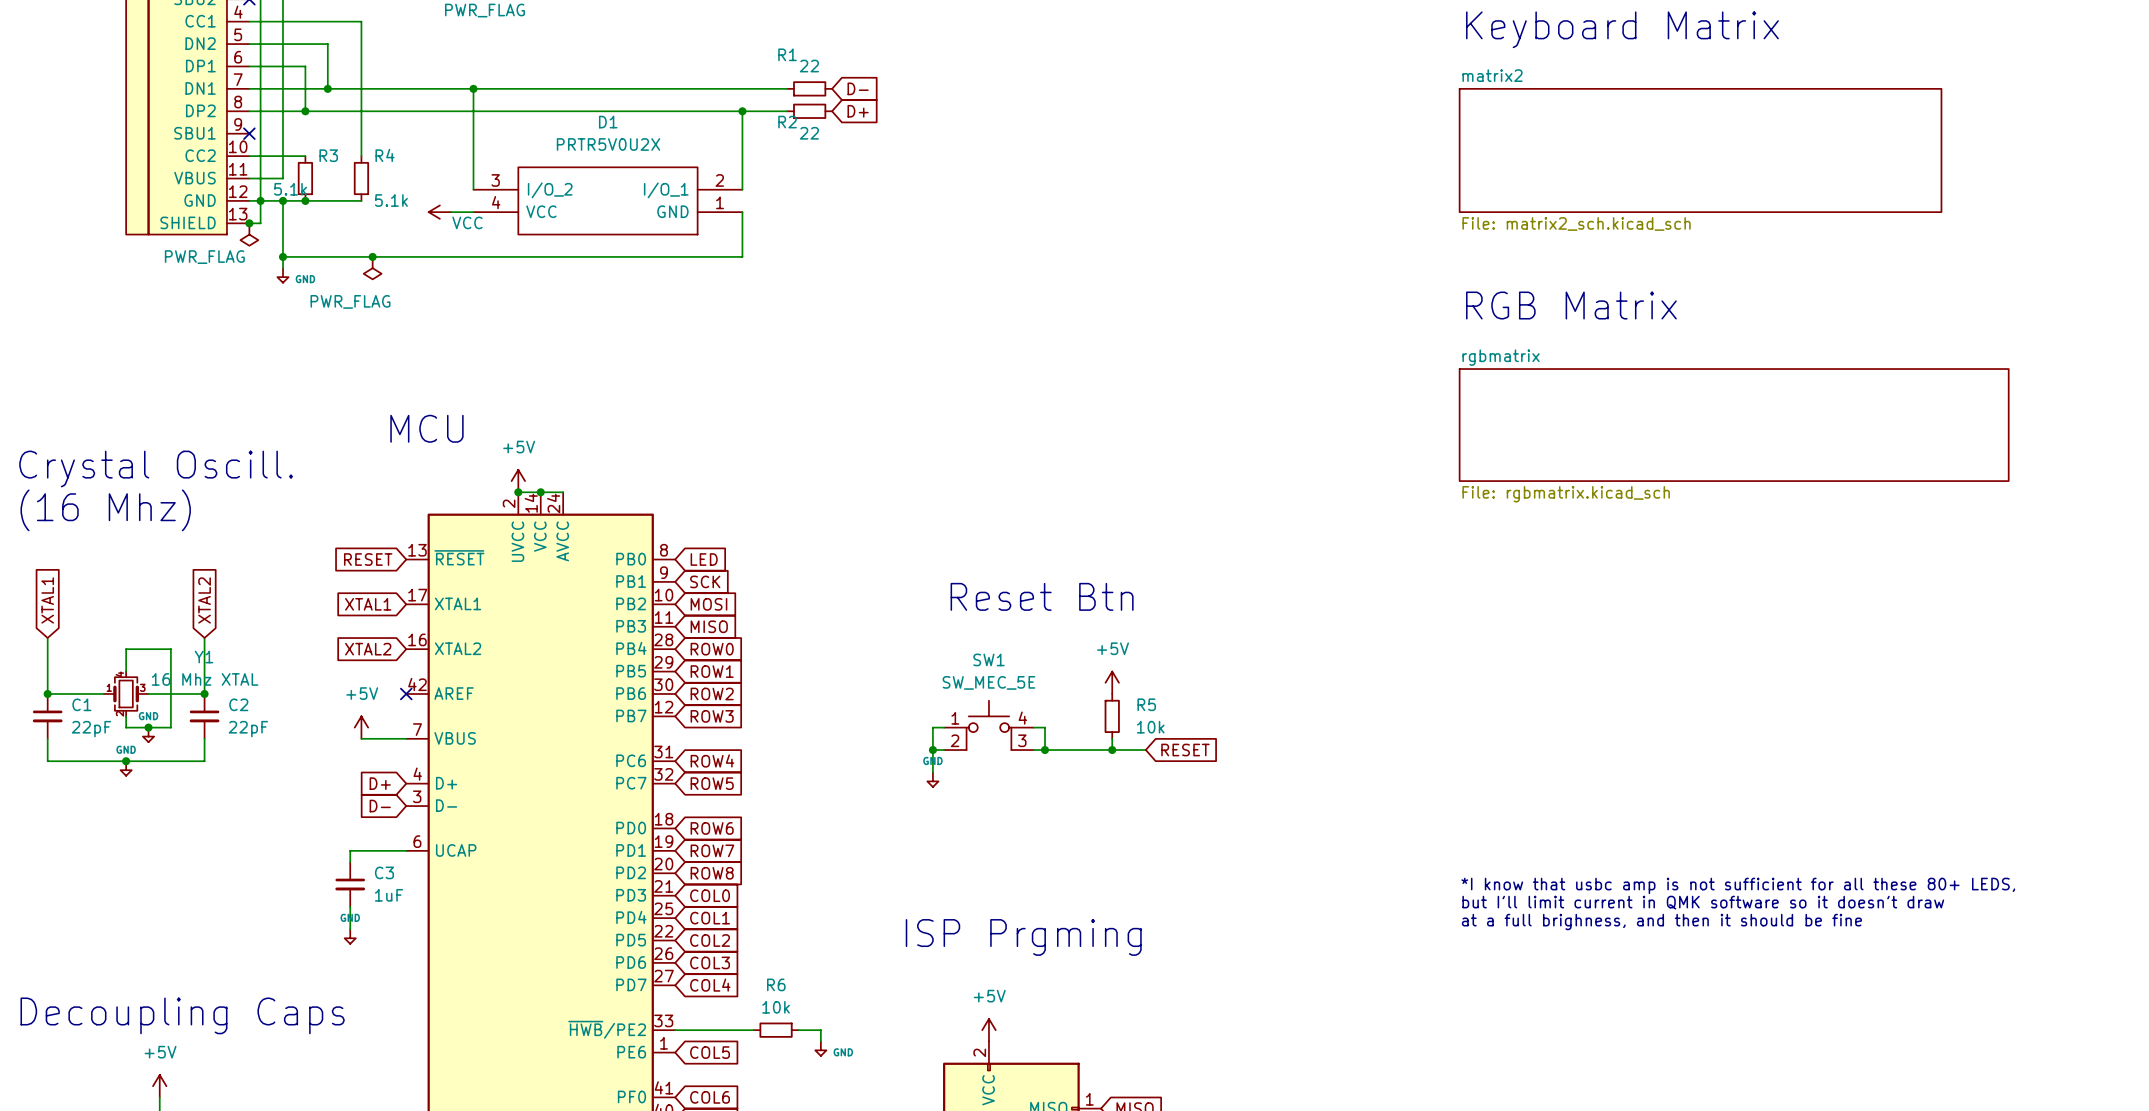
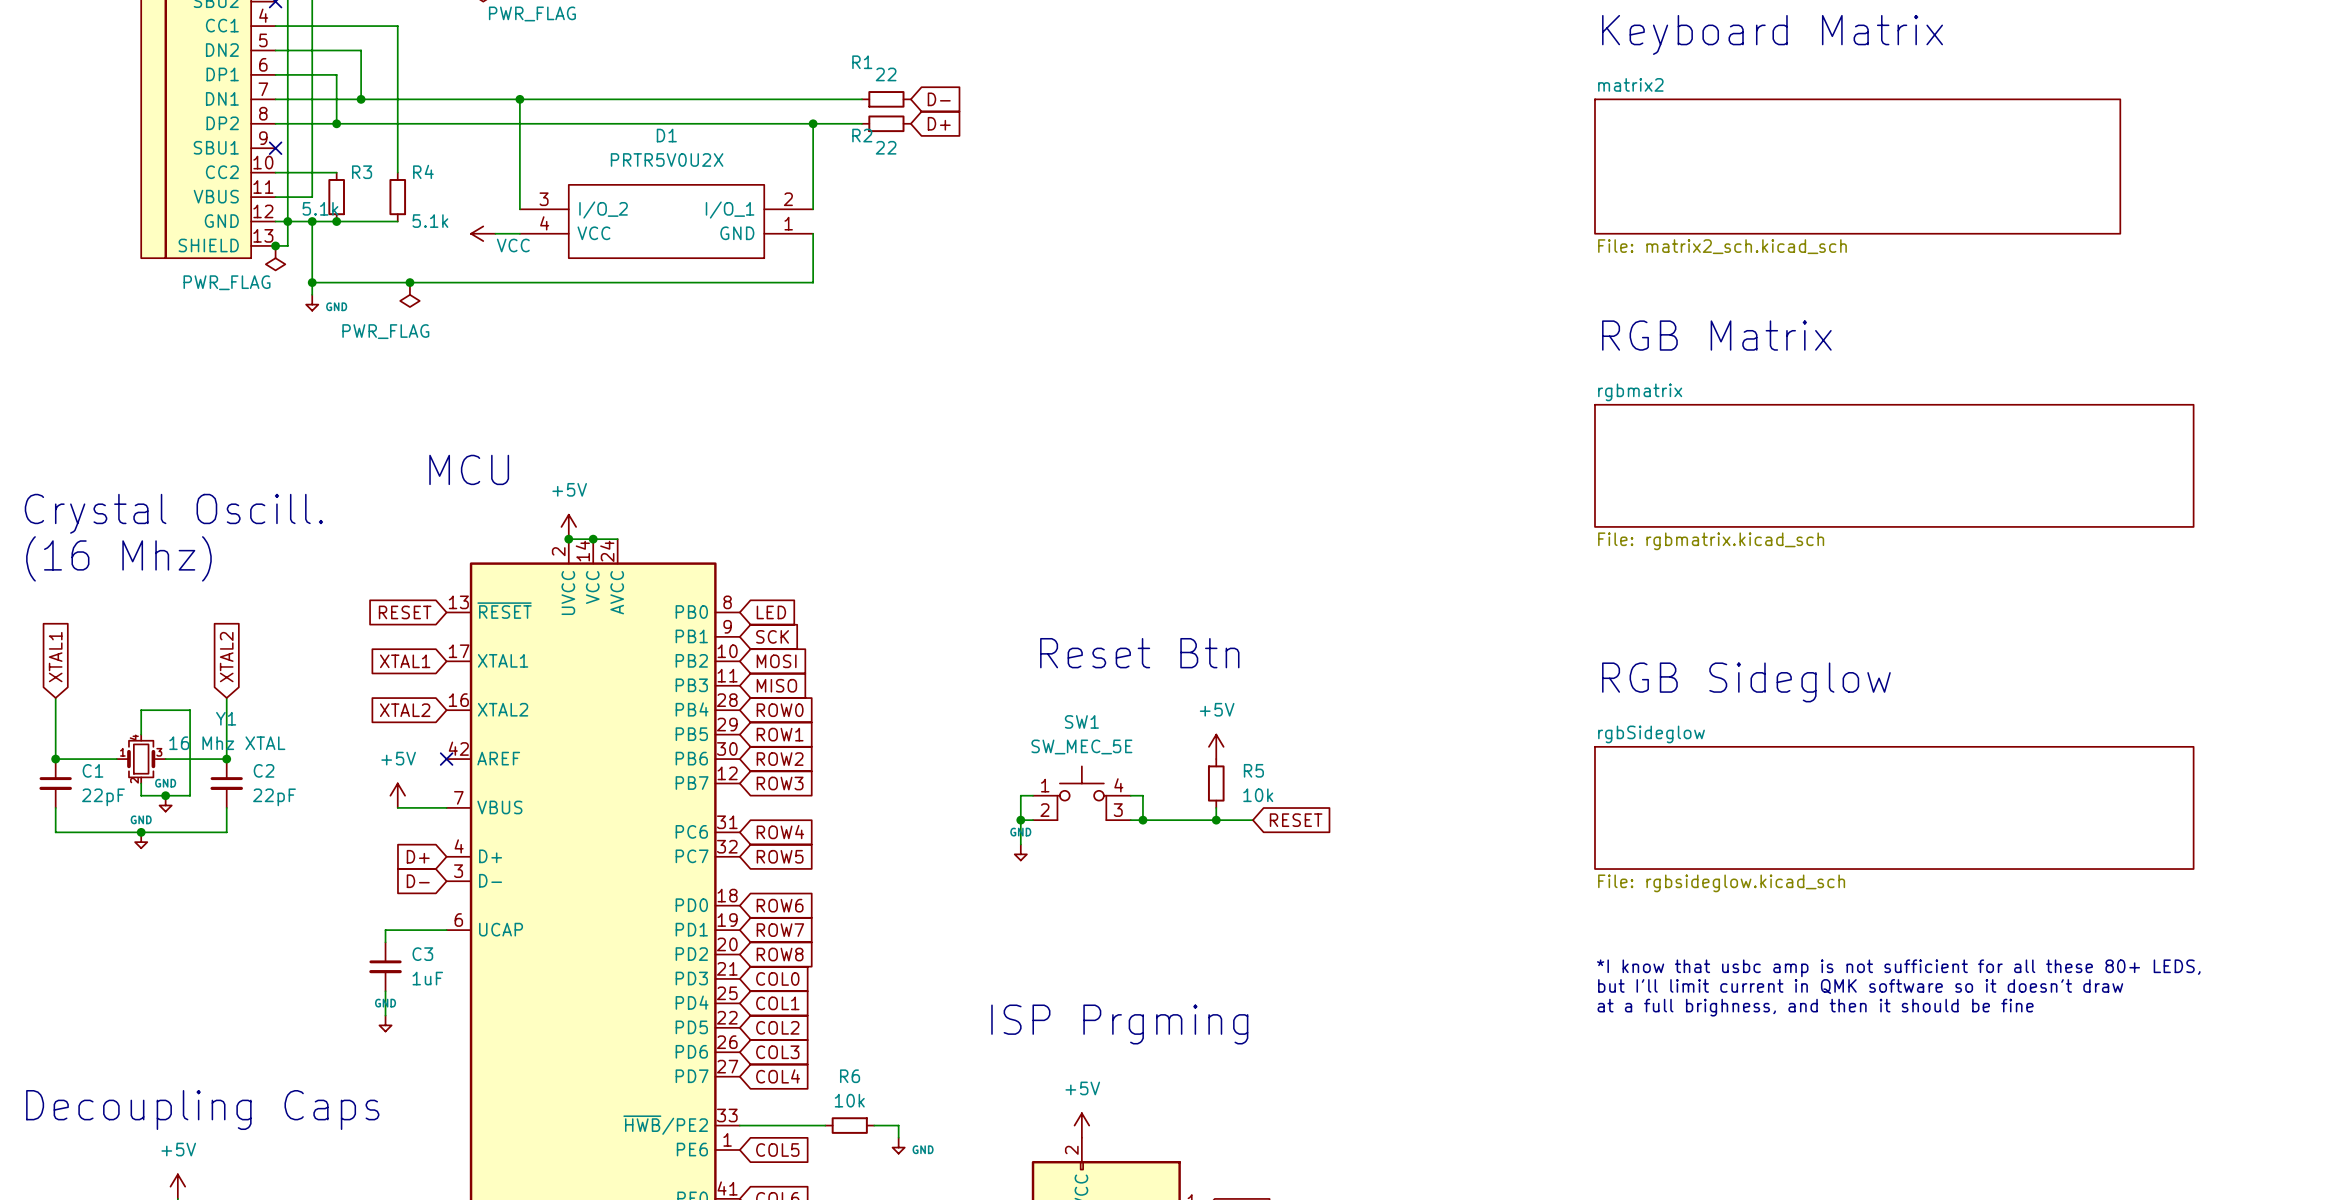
text: none -> RGB Sideglow (1746, 682)
sheet rgbSideglow: none -> File: rgbsideglow.kicad_sch (1894, 807)

